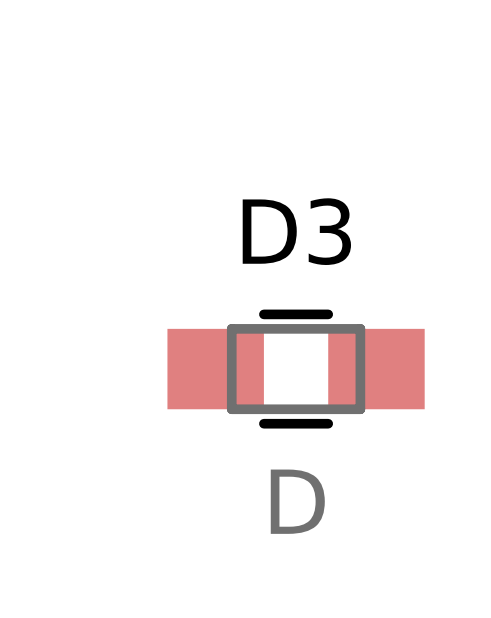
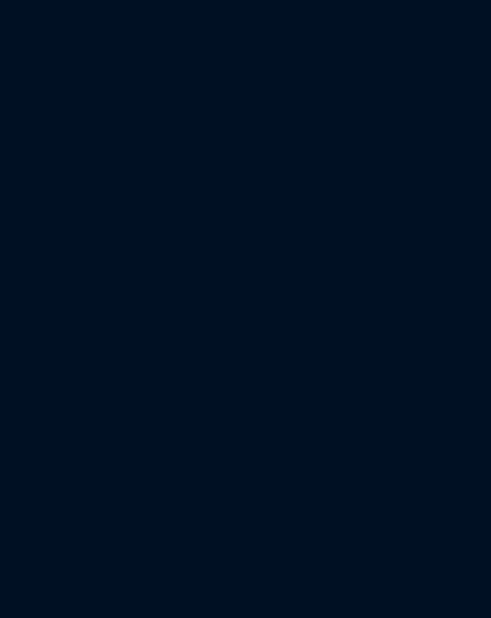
D3: D (296, 369) -> none

